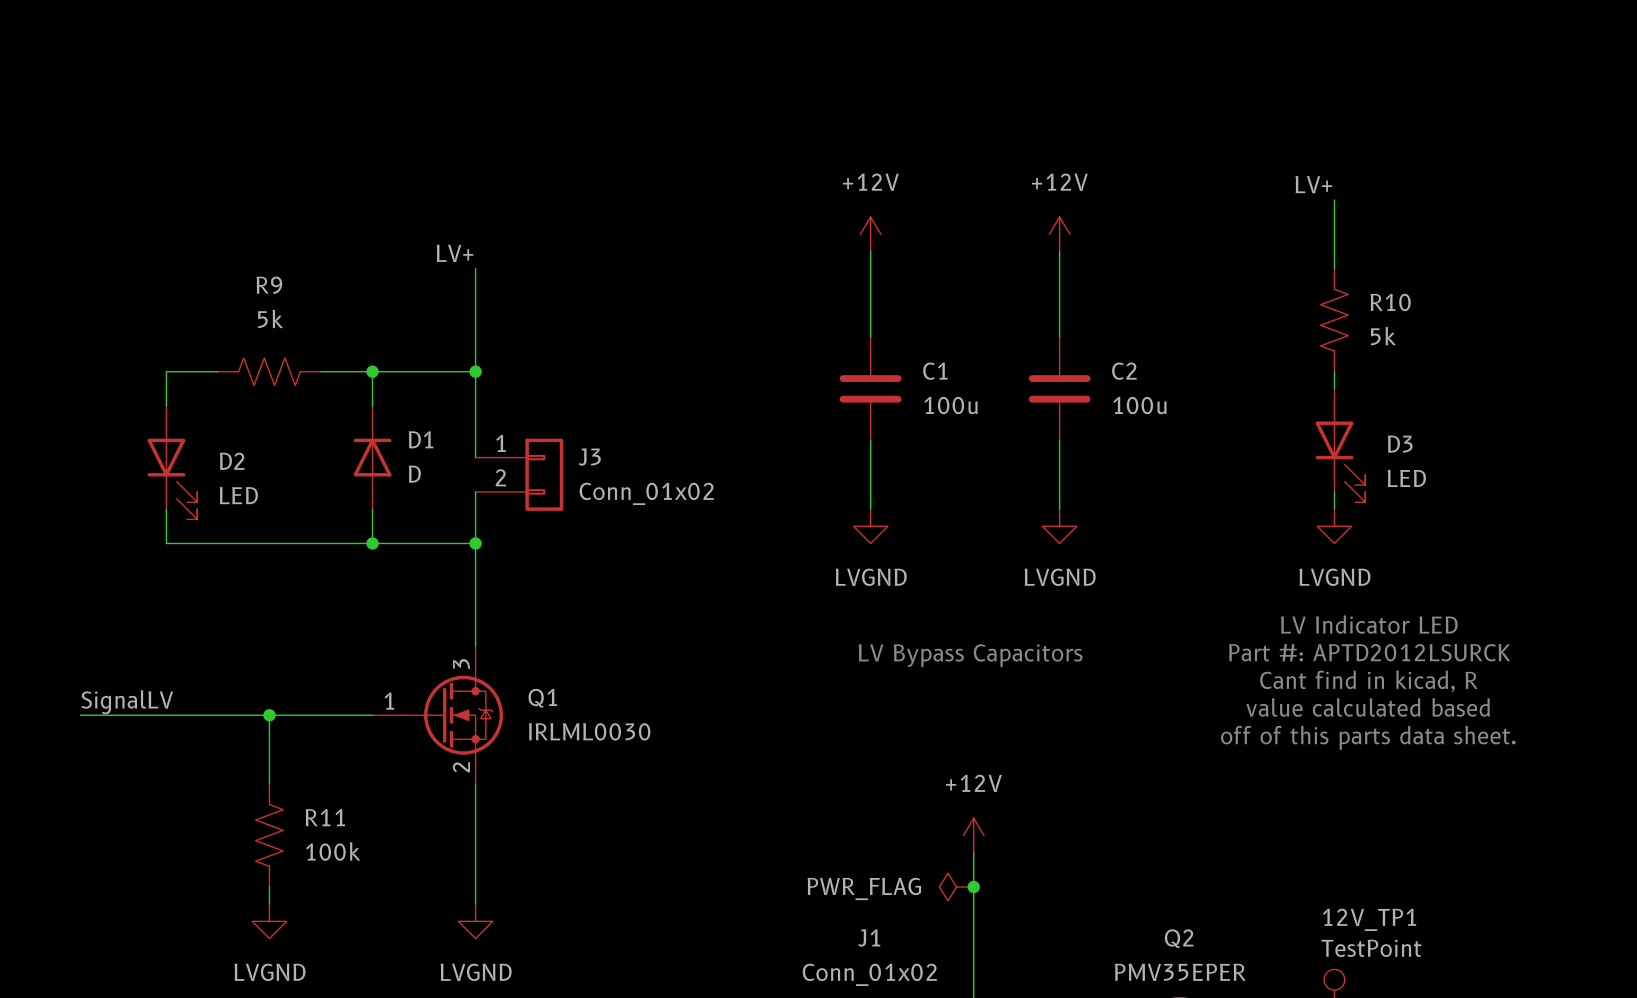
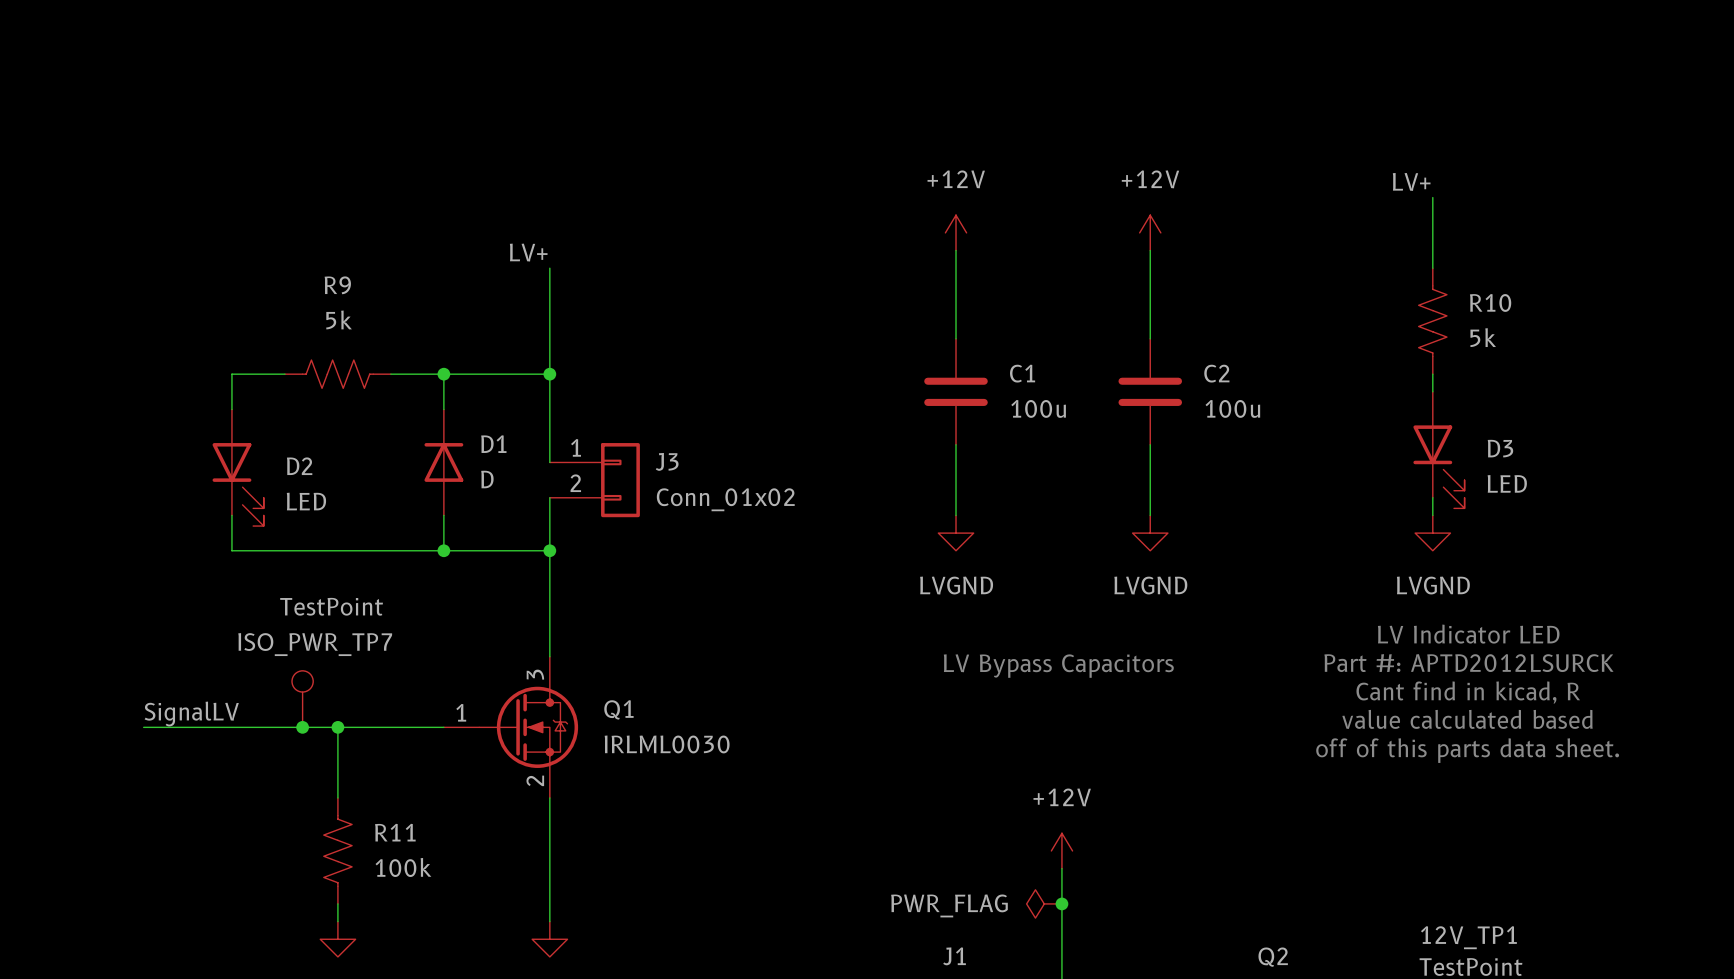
ISO_PWR_TP7: none -> TestPoint (302, 699)
junction: none -> (302, 727)

